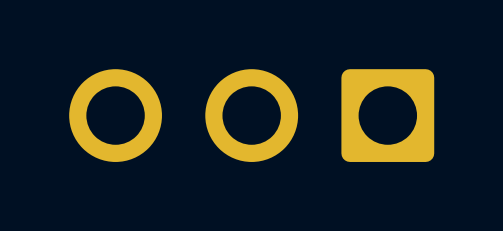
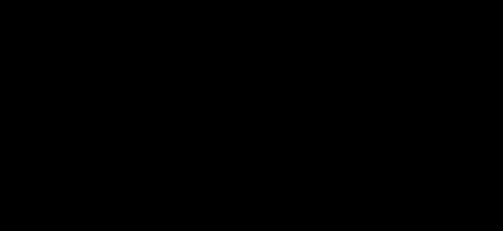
part: (251, 115) -> none

